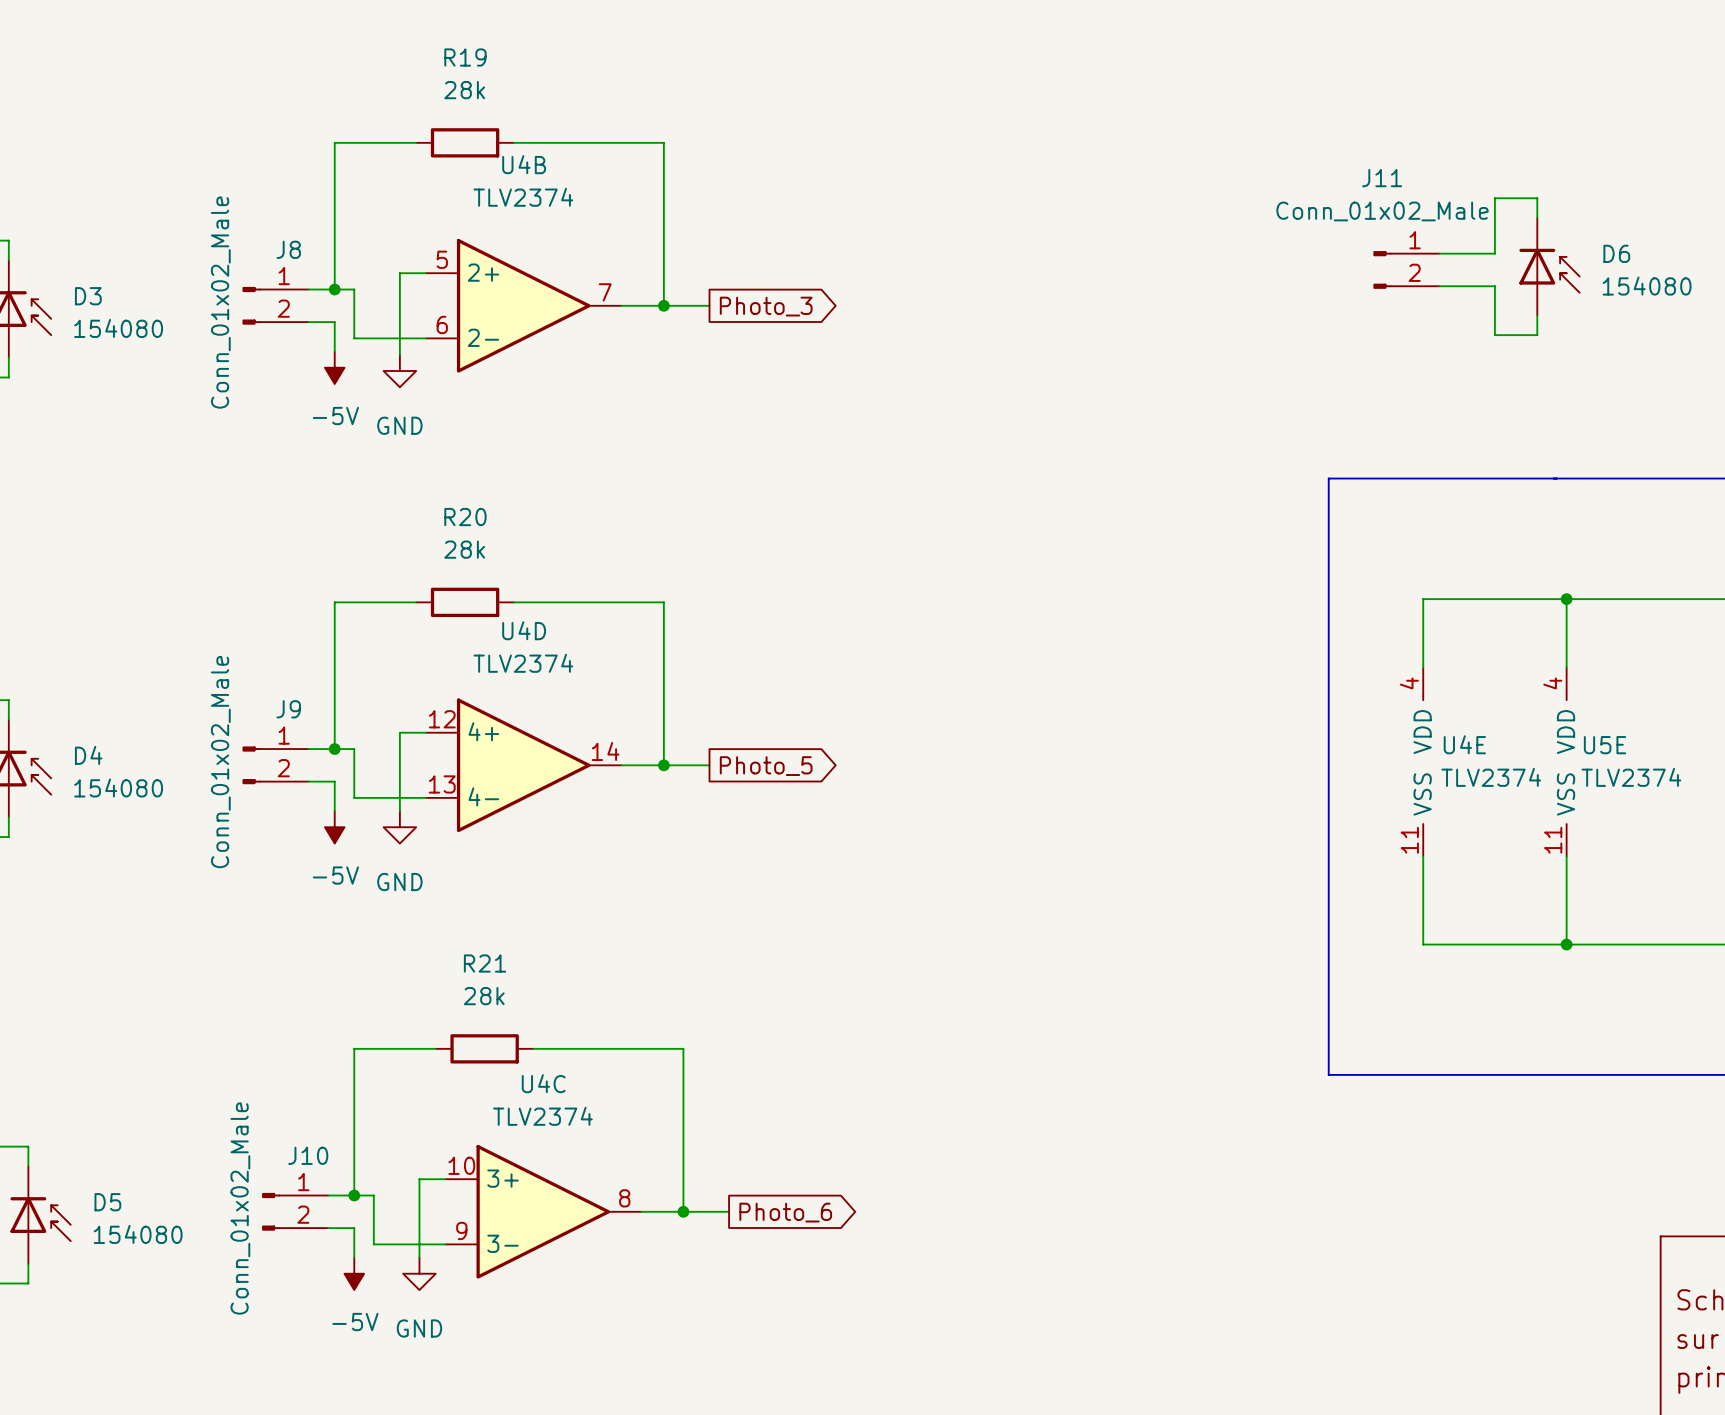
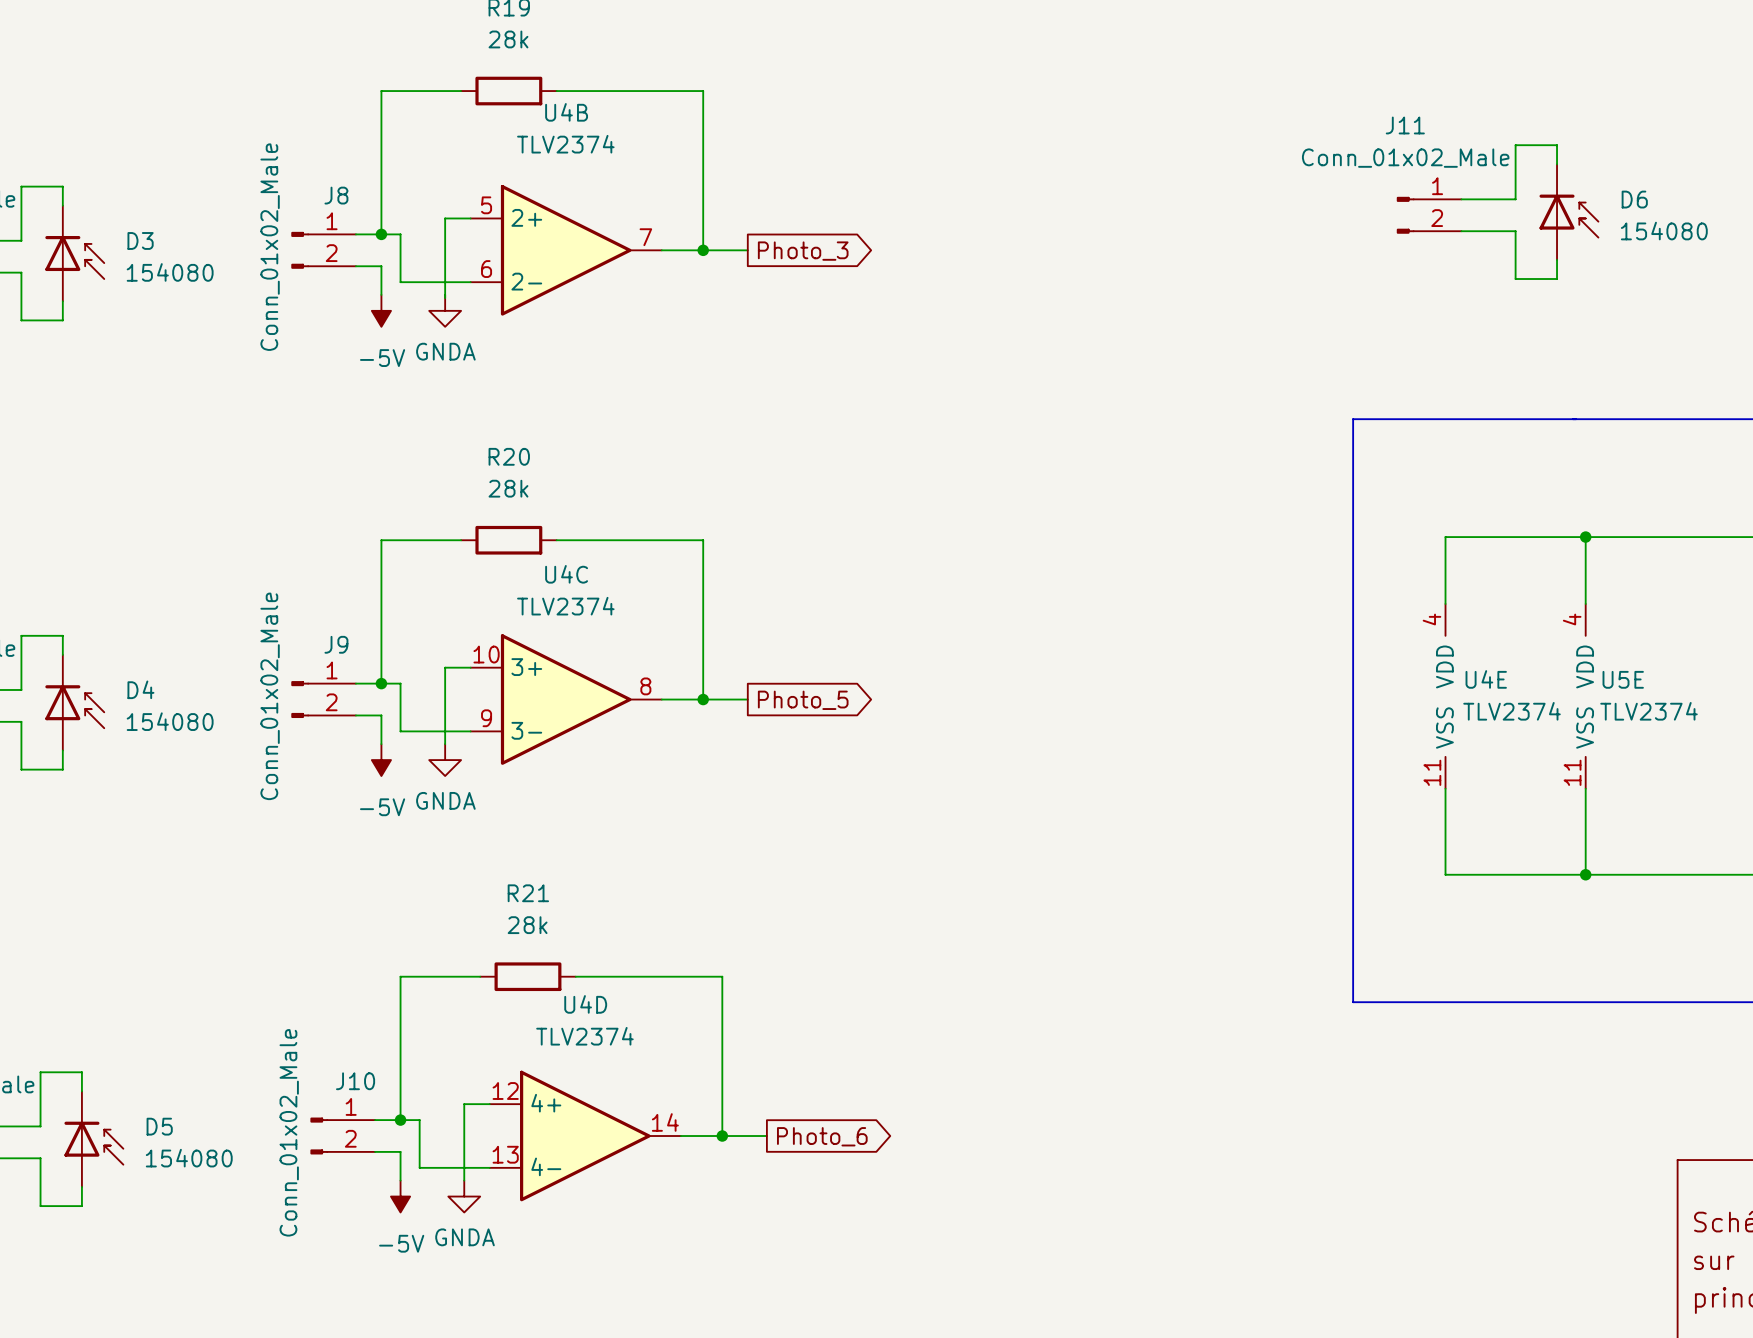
power symbol: GND (399, 370) -> GNDA (445, 310)
U4D position: (523, 765) -> (585, 1136)
power symbol: GND (399, 827) -> GNDA (445, 760)
U4C position: (543, 1211) -> (566, 699)
power symbol: GND (419, 1273) -> GNDA (464, 1196)

